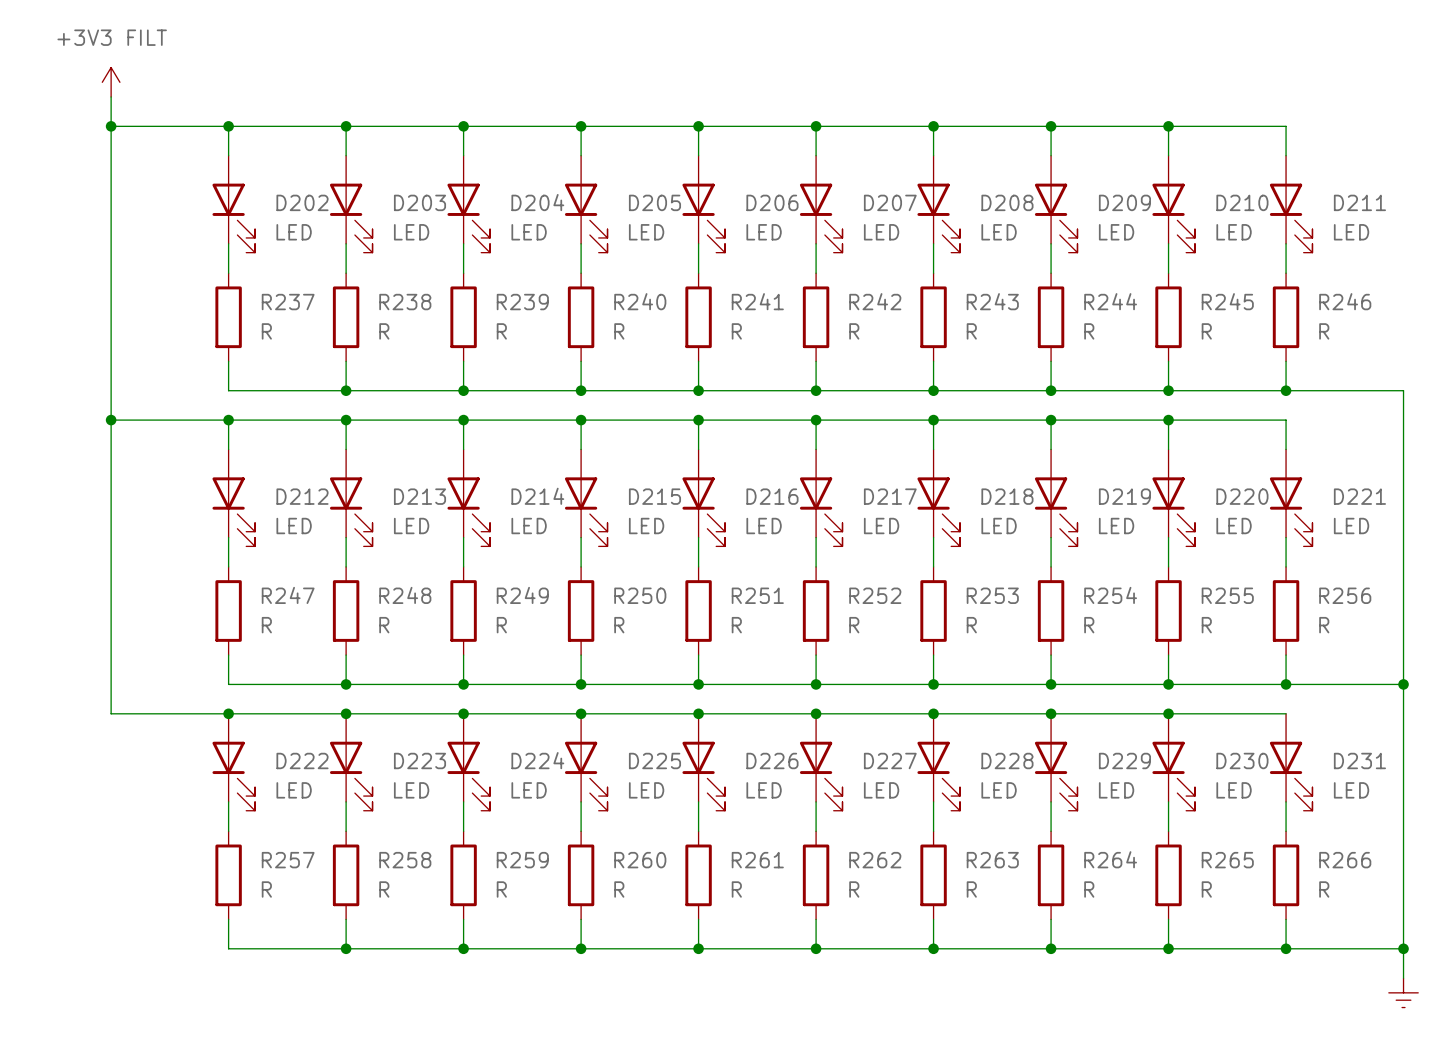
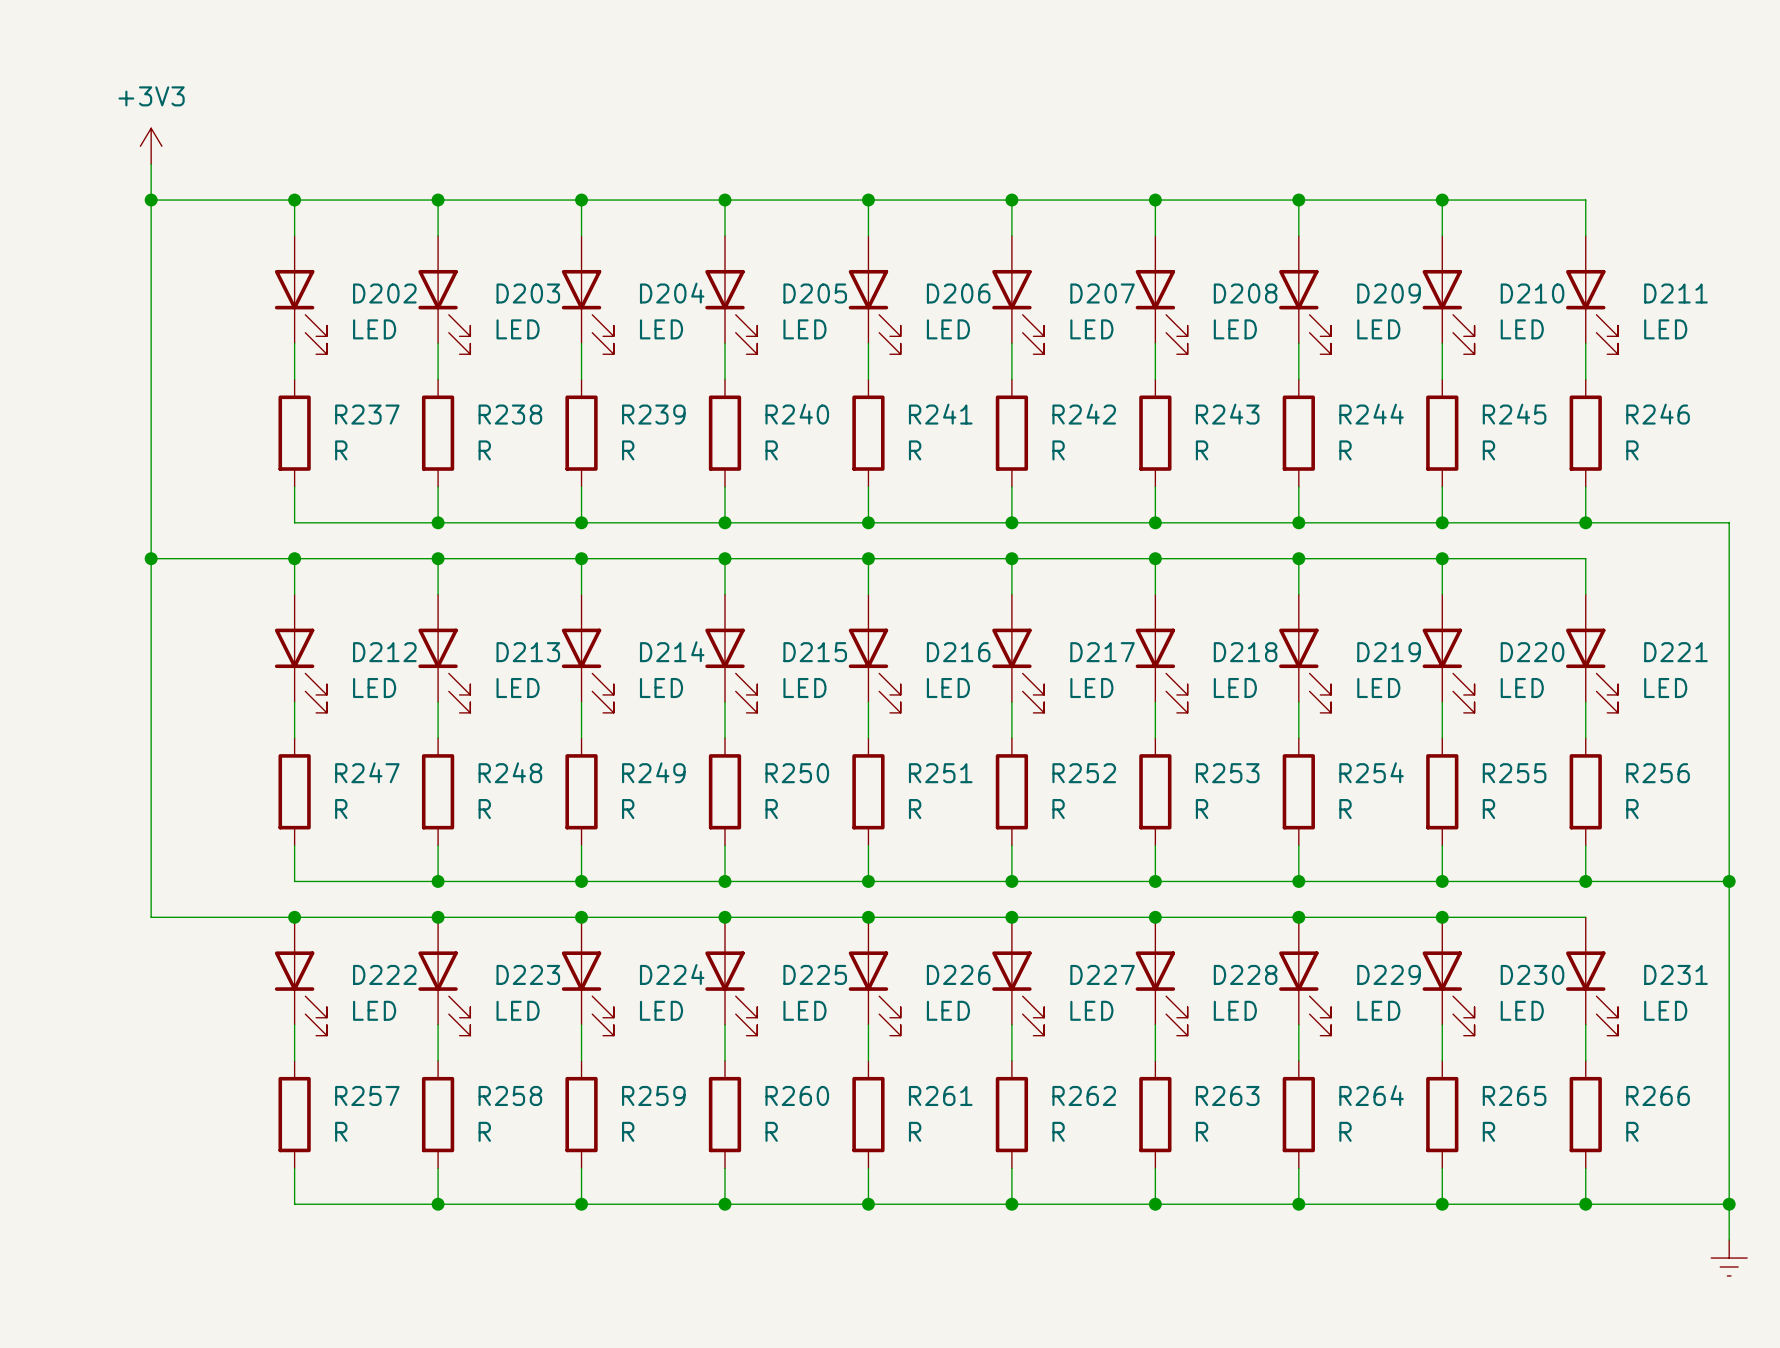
power symbol: +3V3 FILT (111, 82) -> +3V3 (151, 146)

